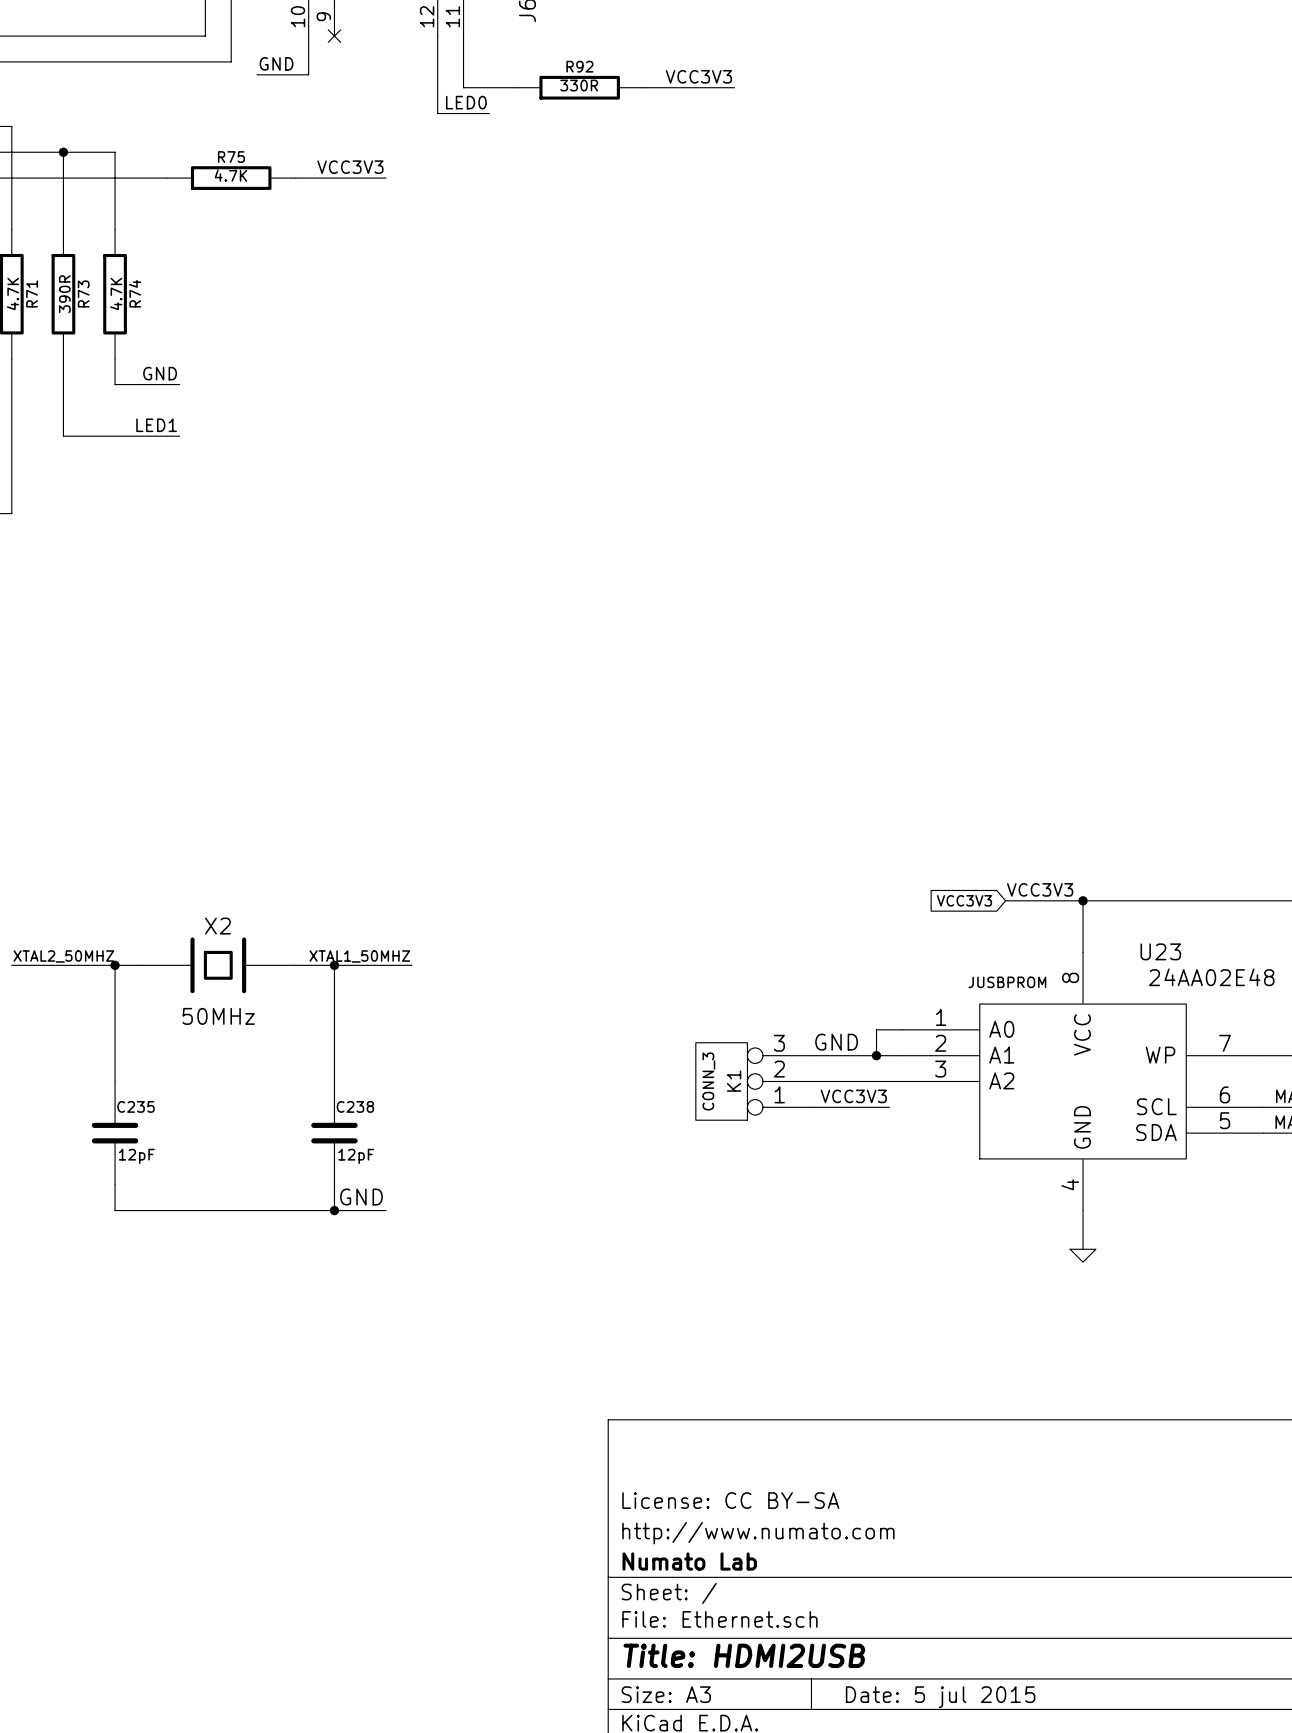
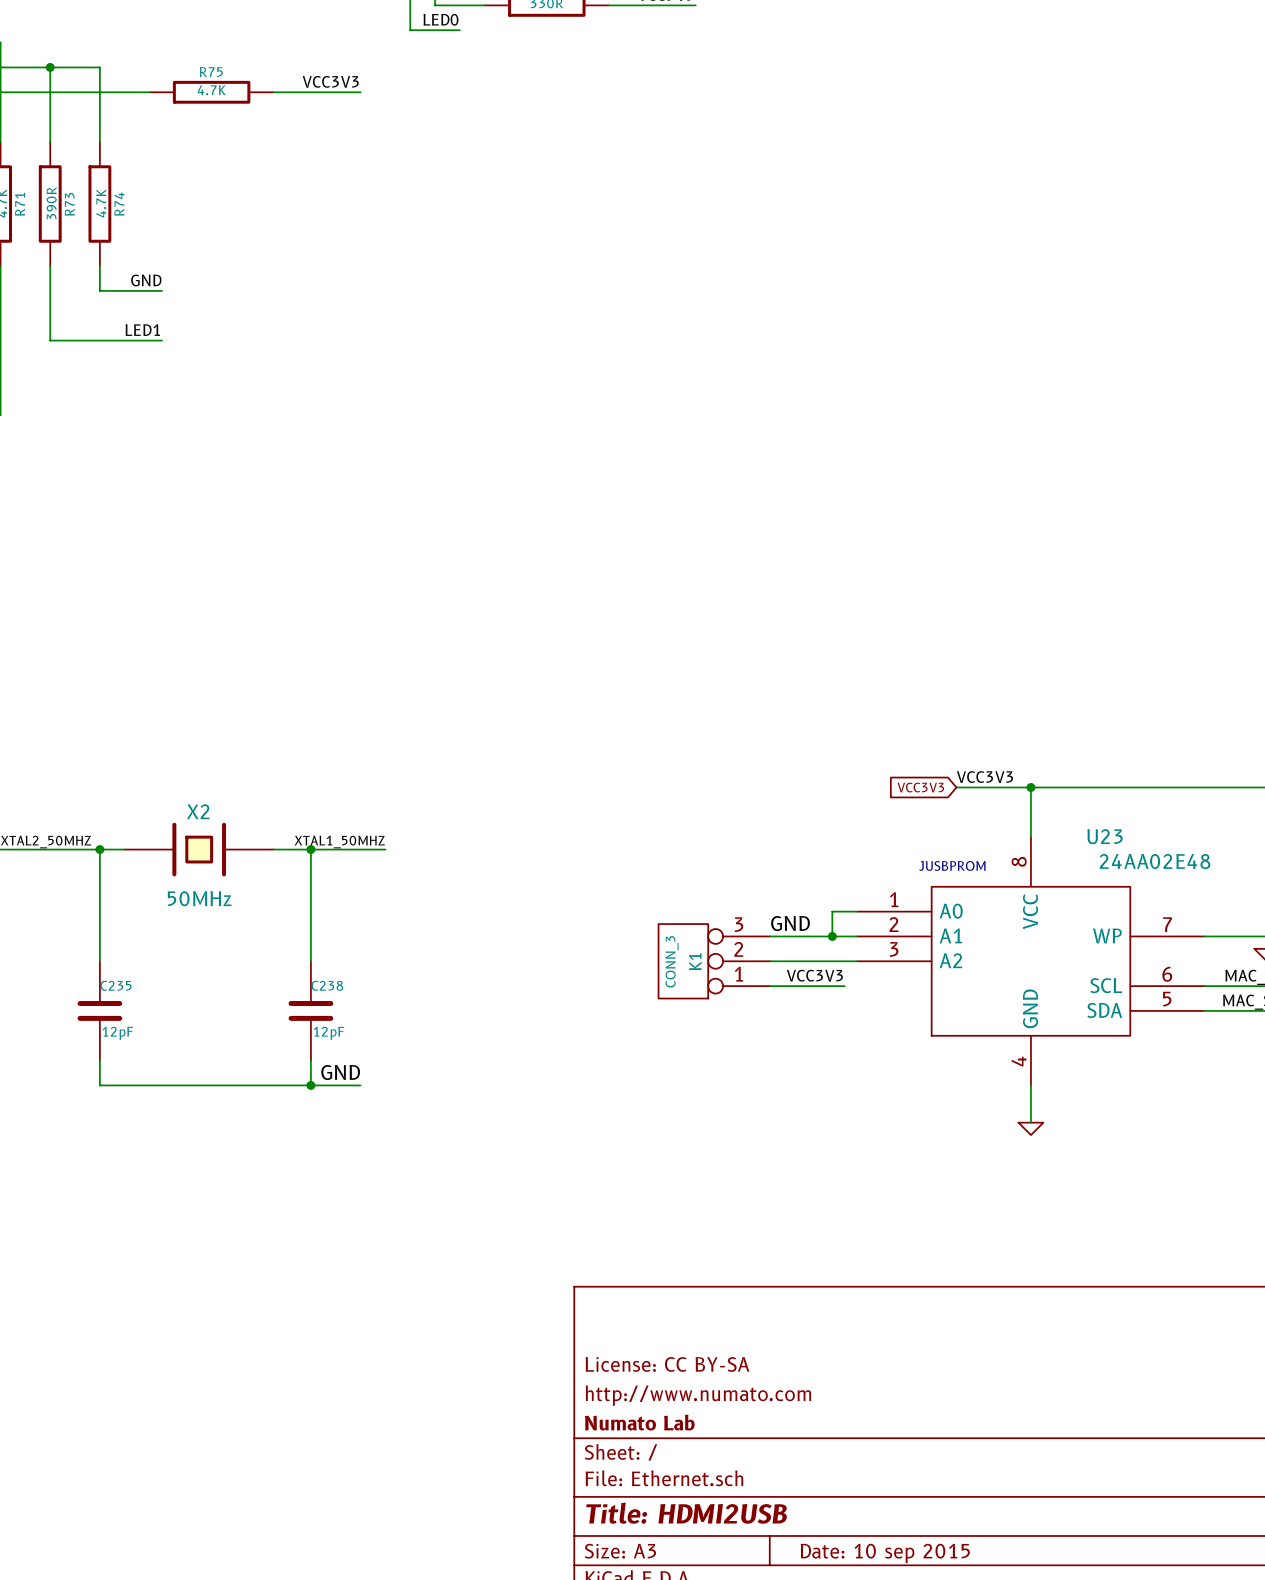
title block: Date: 5 jul 2015 (940, 1697) -> Date: 10 sep 2015 (885, 1553)

